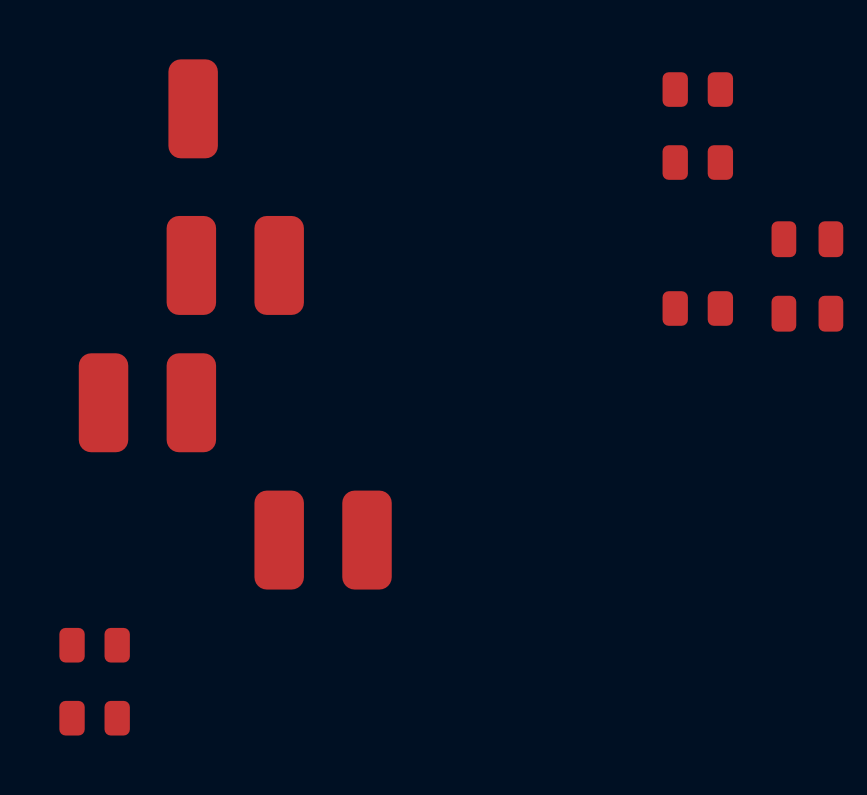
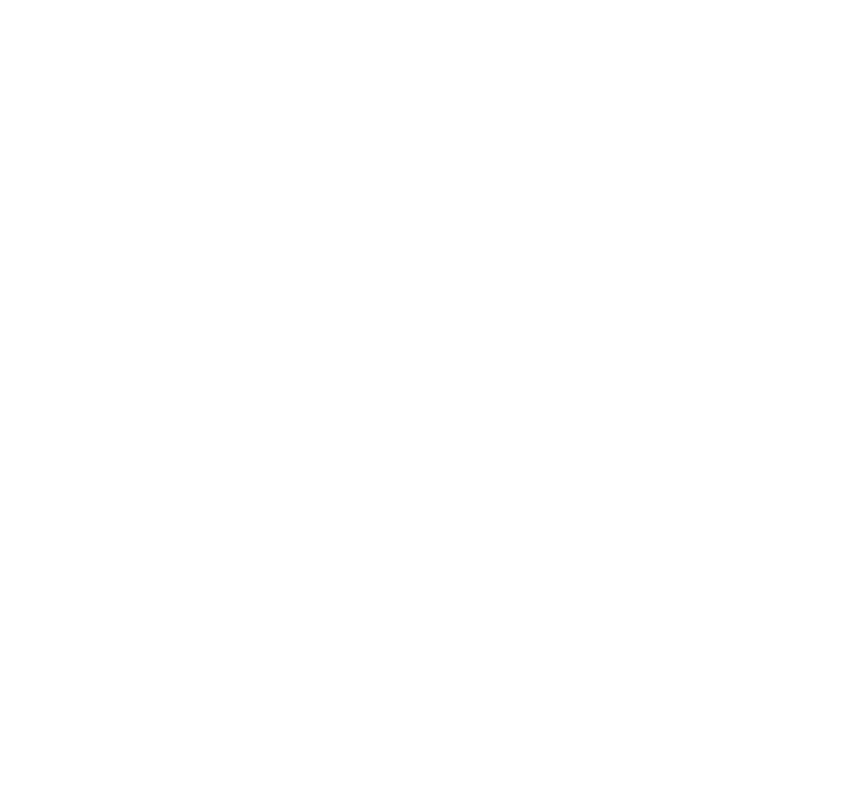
part: (697, 89) -> none
part: (193, 108) -> none
part: (697, 162) -> none
part: (807, 239) -> none
part: (191, 265) -> none
part: (279, 265) -> none
part: (697, 308) -> none
part: (807, 313) -> none
part: (103, 402) -> none
part: (191, 402) -> none
part: (279, 540) -> none
part: (367, 540) -> none
part: (94, 645) -> none
part: (94, 718) -> none

